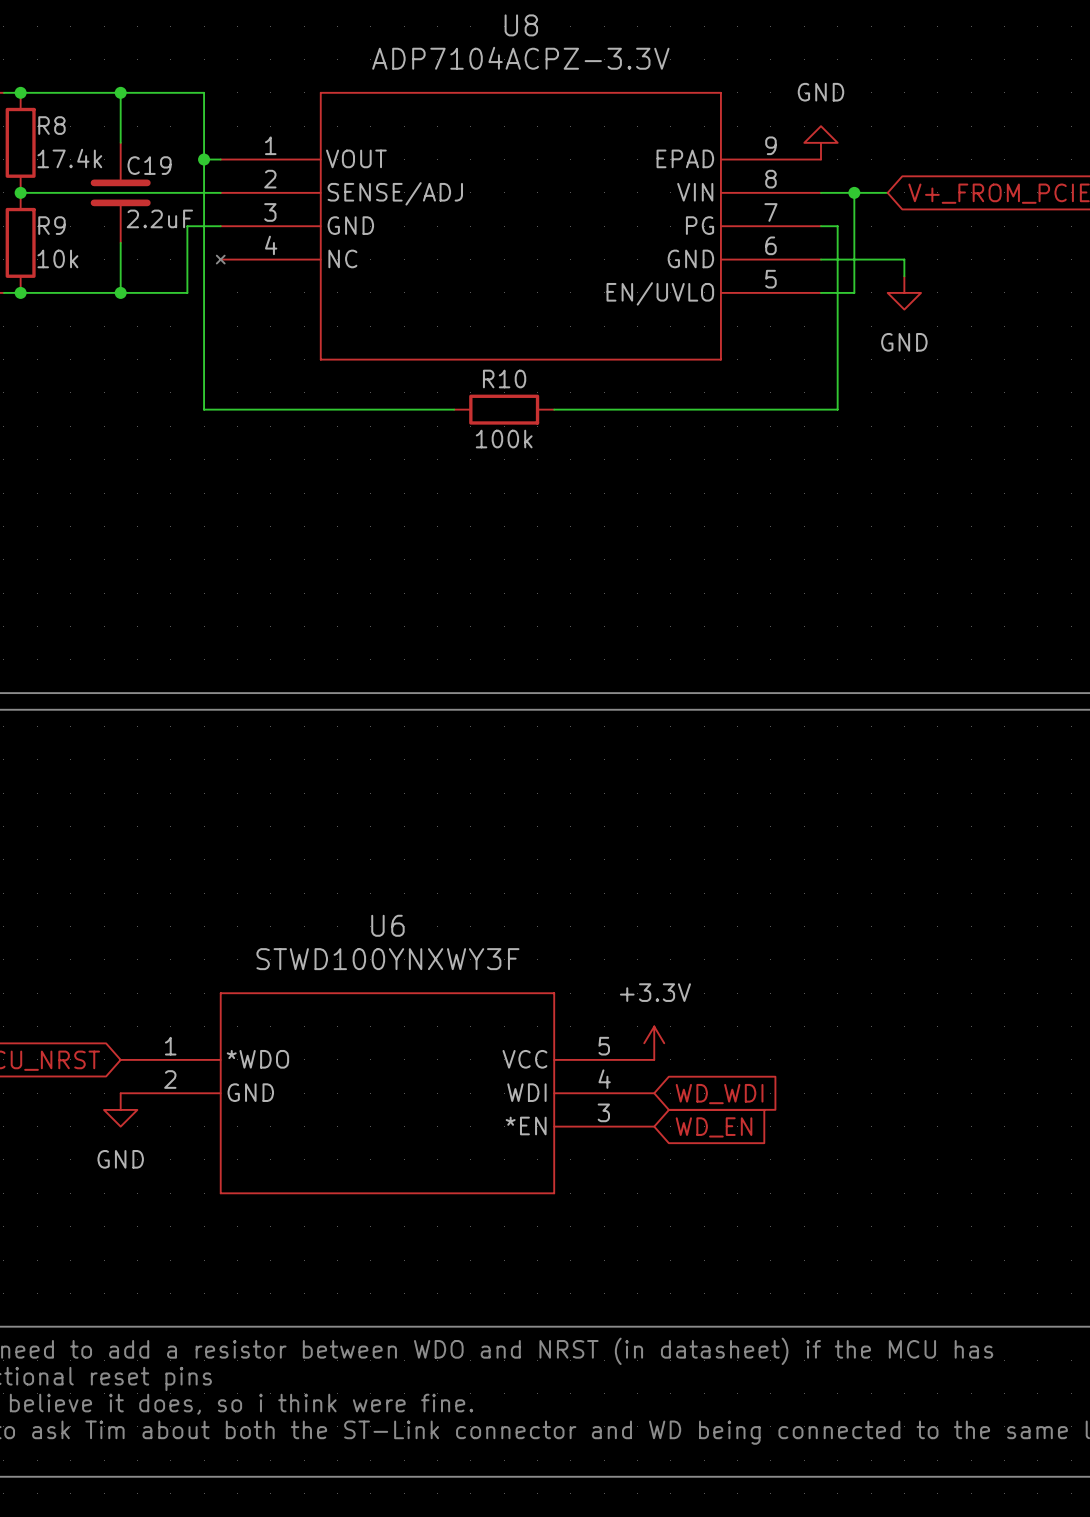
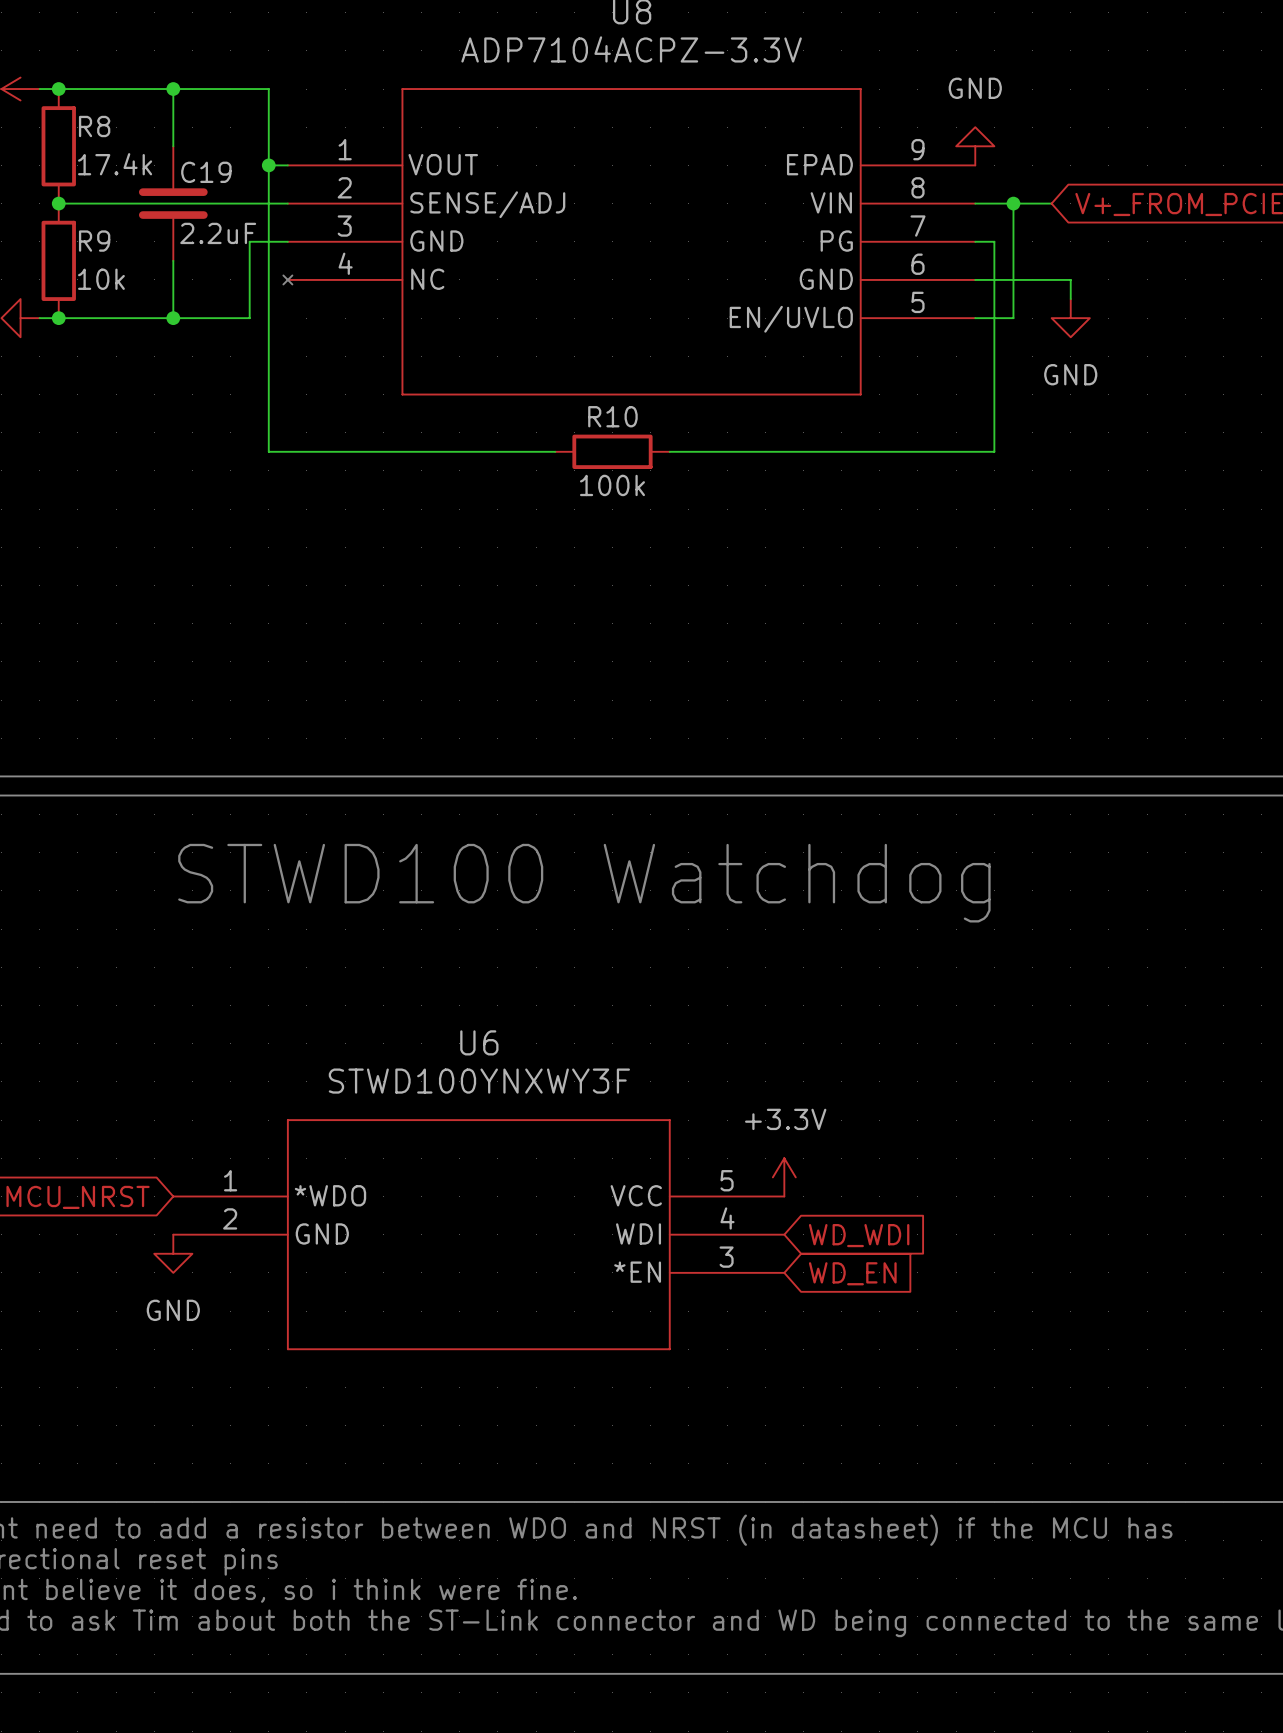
text: none -> STWD100 Watchdog (584, 883)

